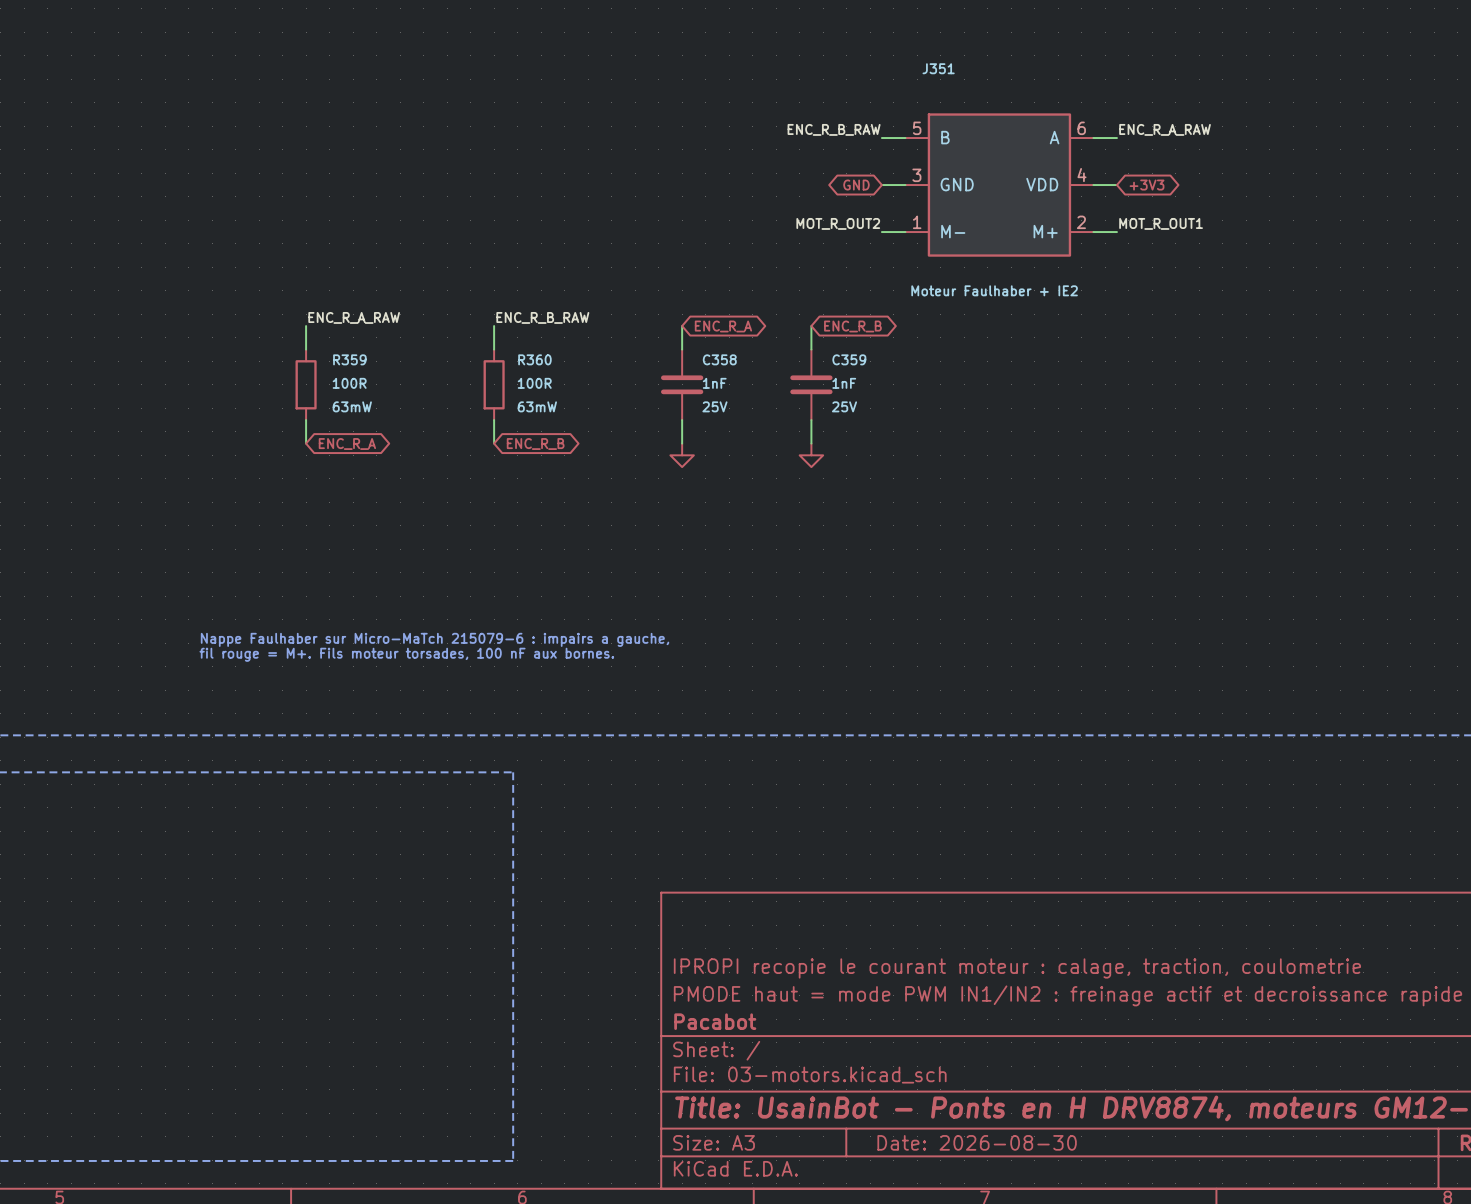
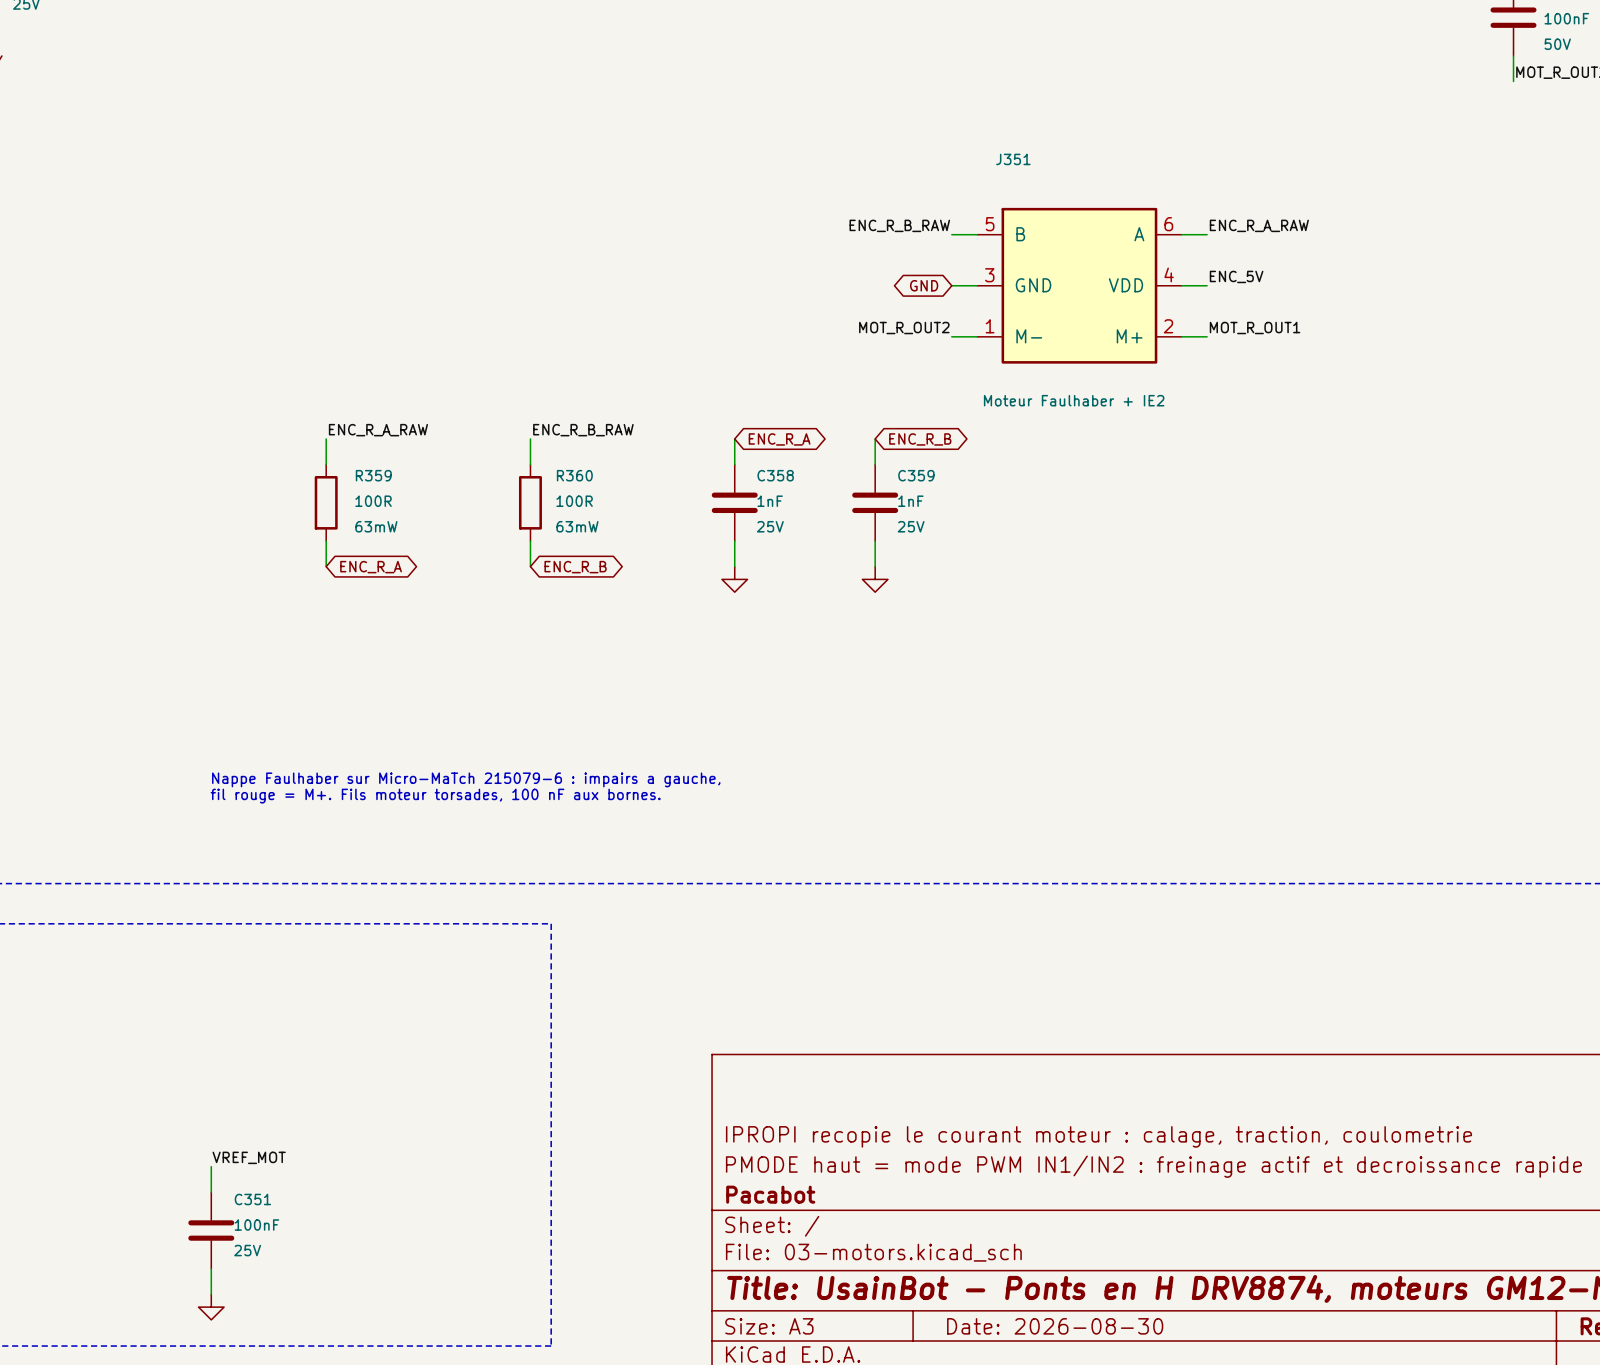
label: none -> ENC_5V (1236, 276)
global label: +3V3 (1147, 185) -> none
label: none -> VREF_MOT (249, 1157)
wire: none -> (211, 1166) (211, 1192)
C351: none -> 100nF (211, 1230)
wire: none -> (211, 1268) (211, 1294)
power symbol: none -> (211, 1307)

